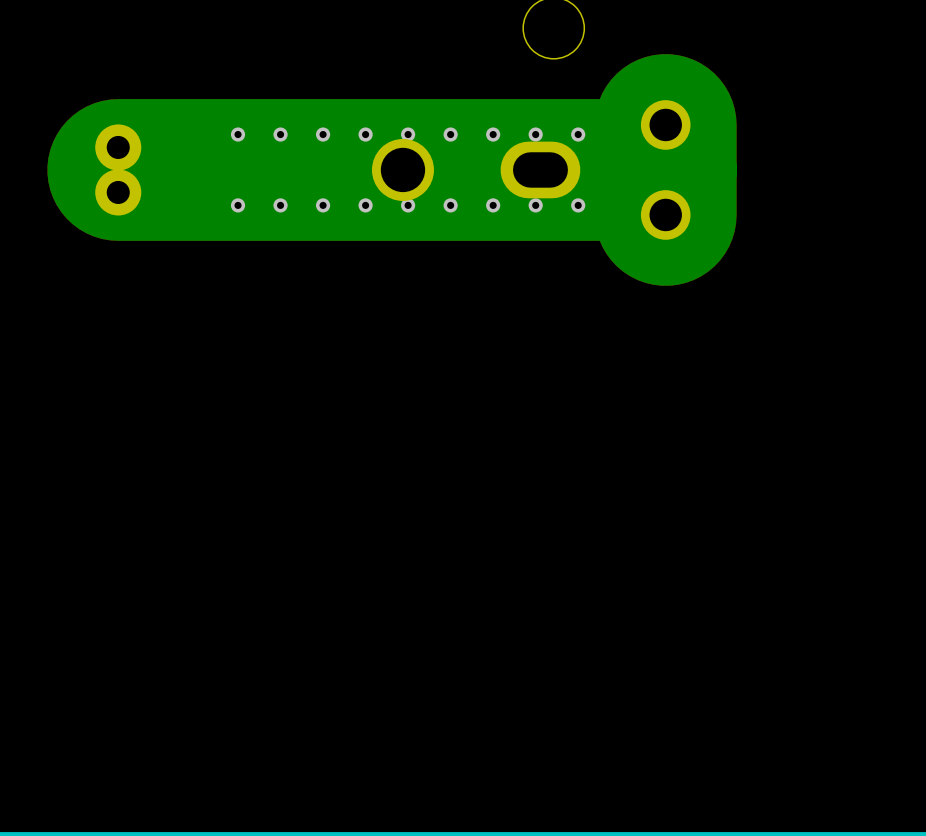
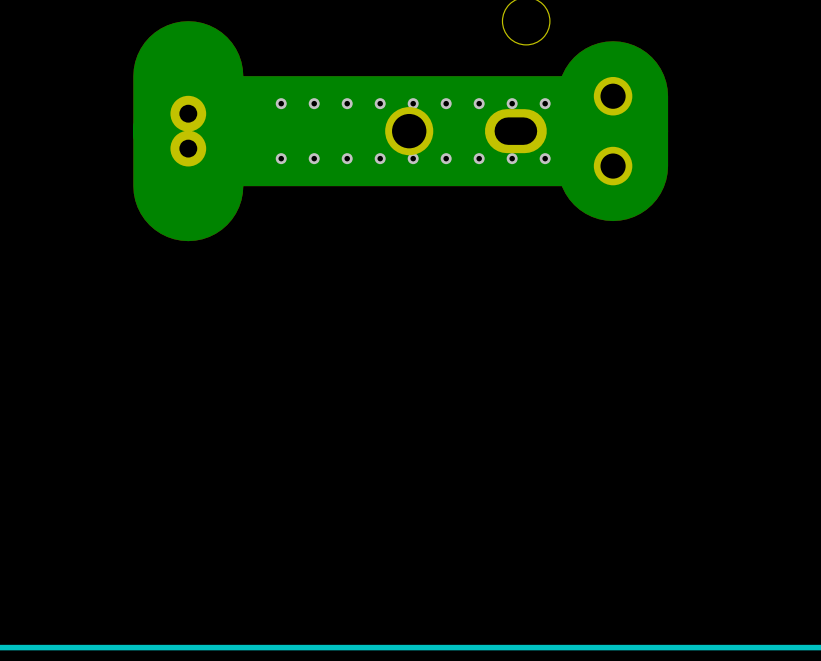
bottom track: none -> (188, 76) (188, 186)

